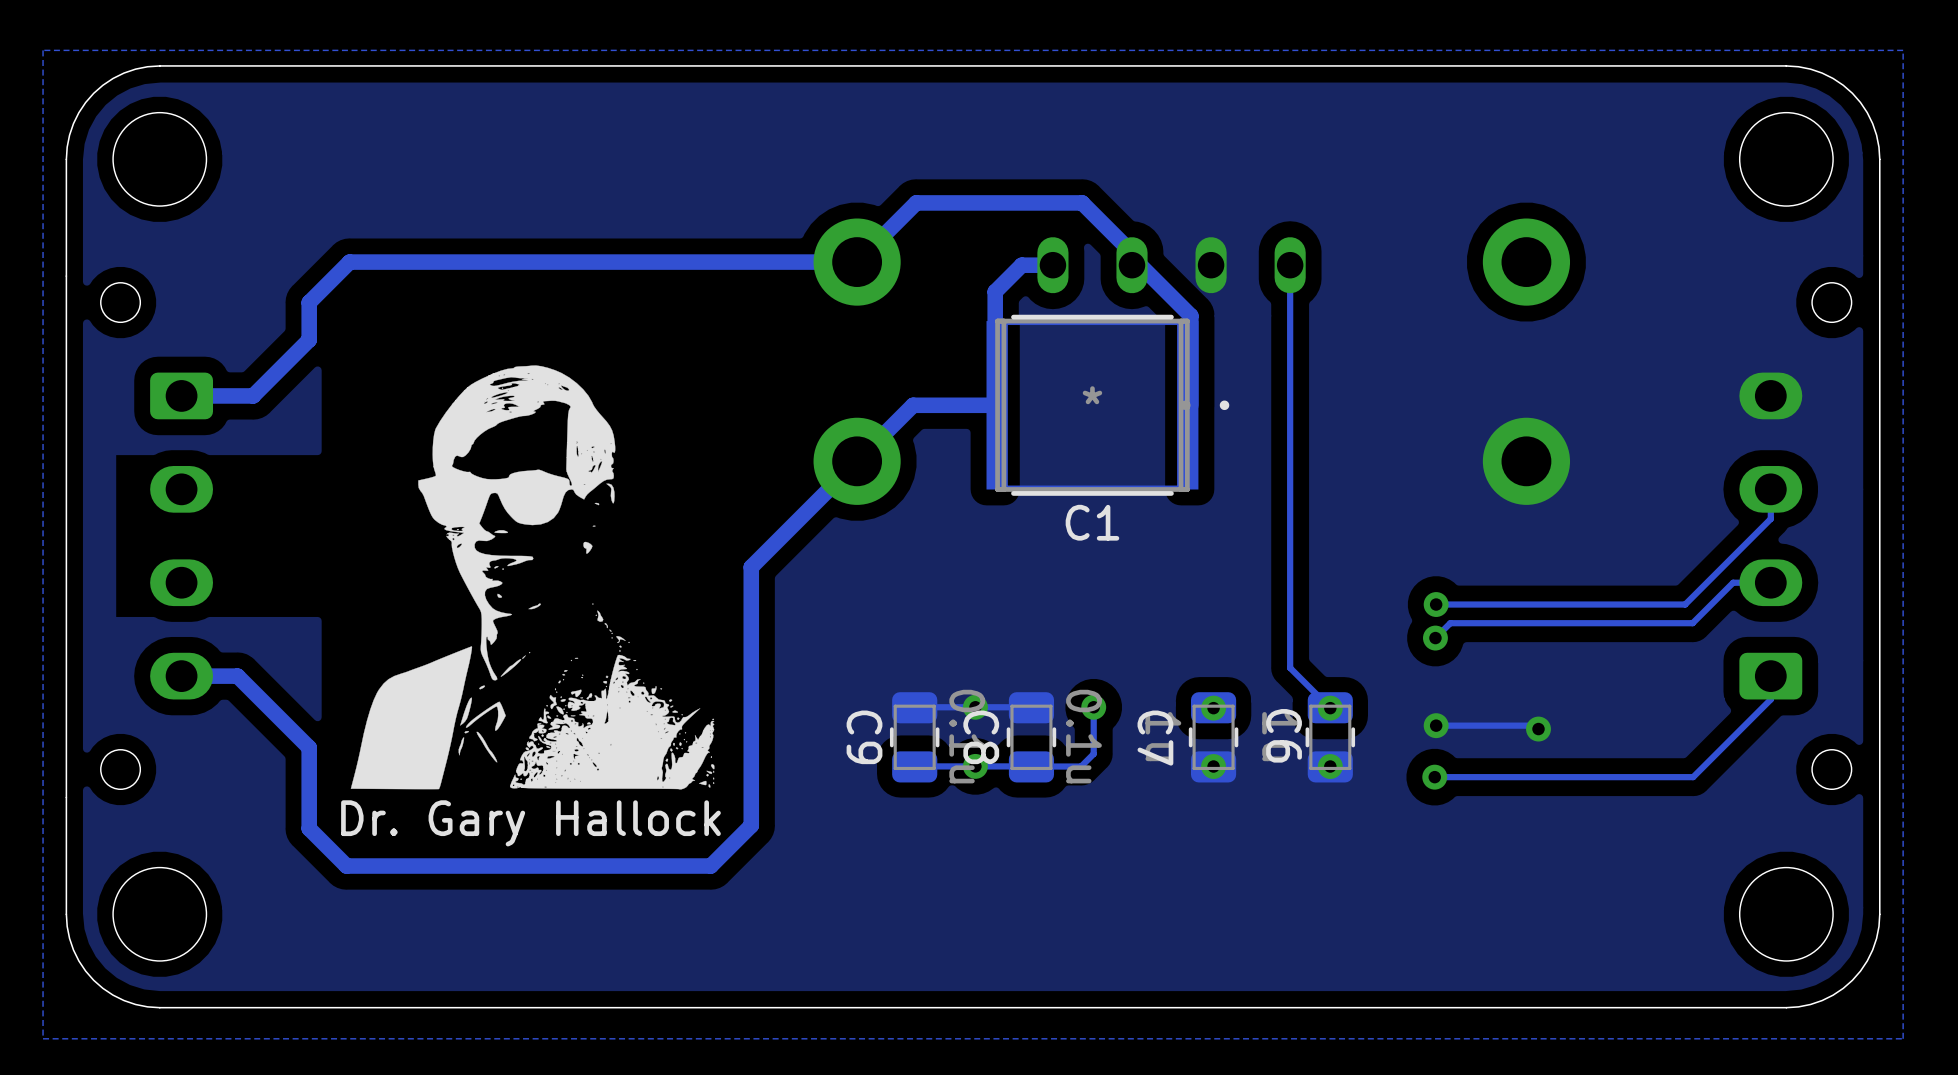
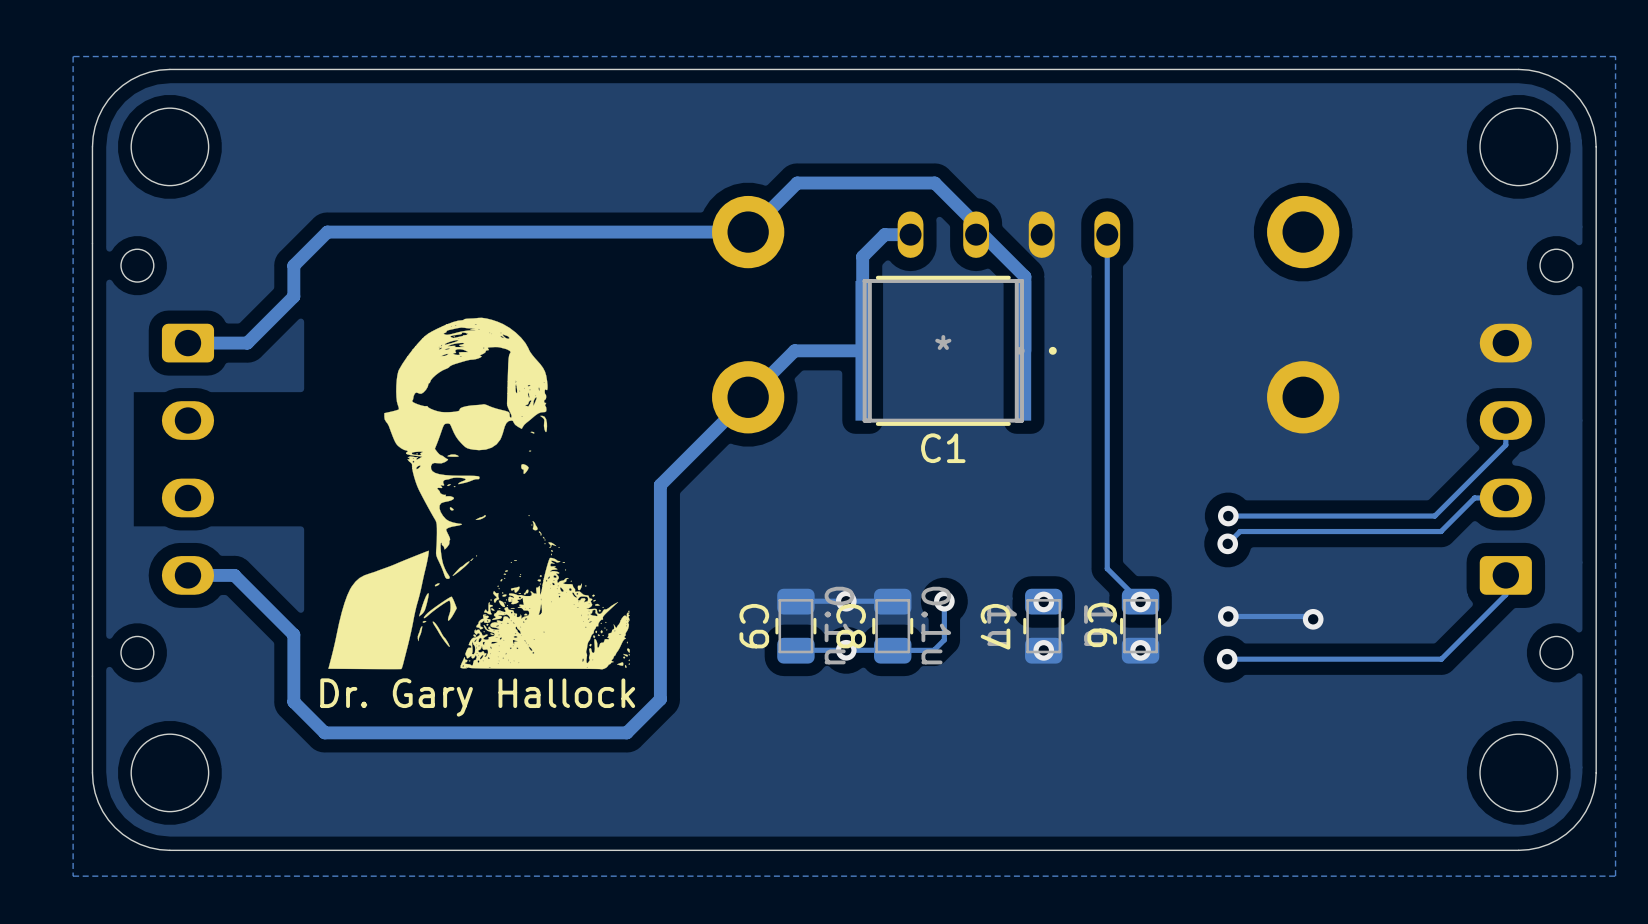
C1 footprint: [986, 314, 1230, 496] -> [855, 275, 1057, 426]

